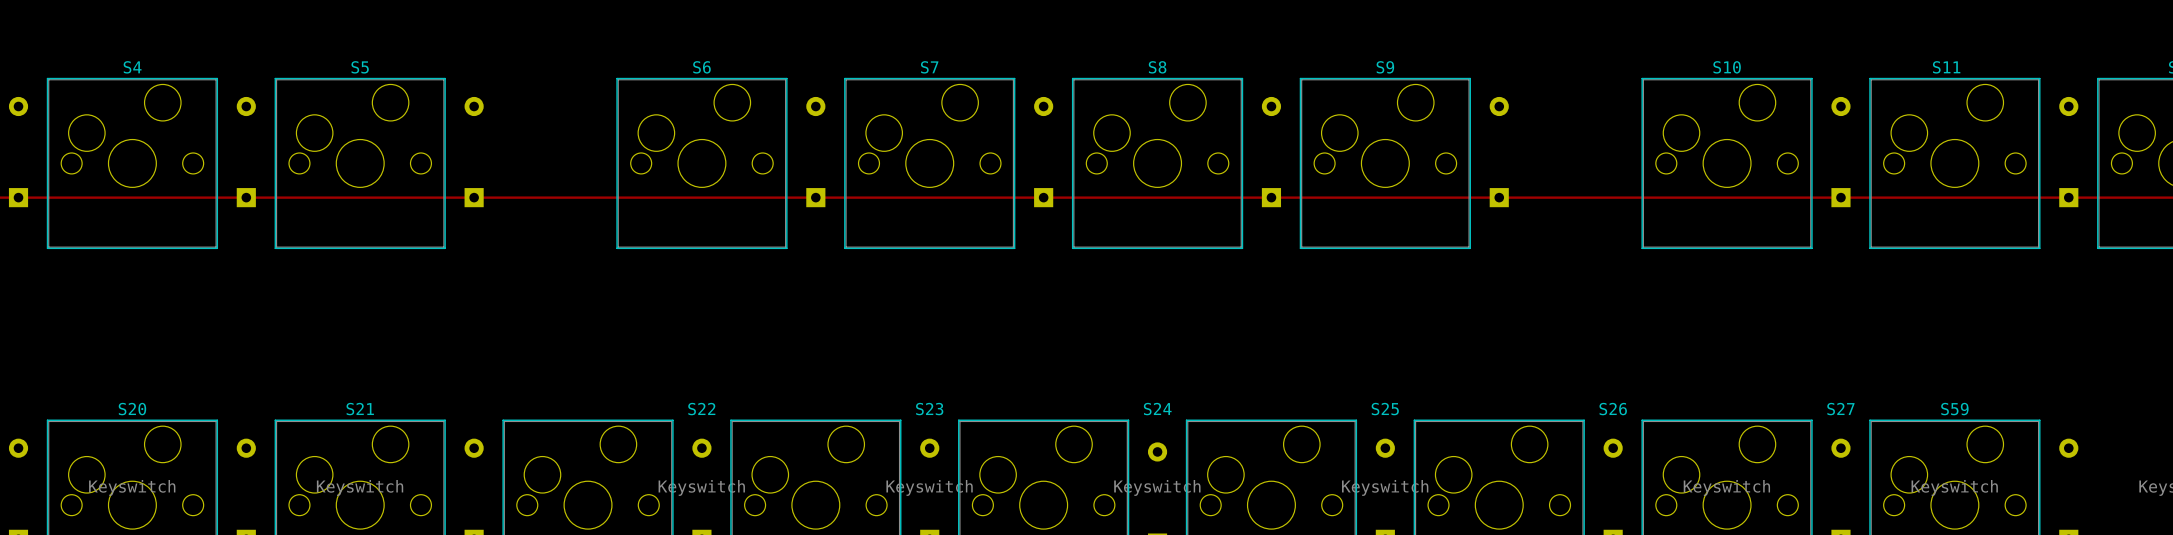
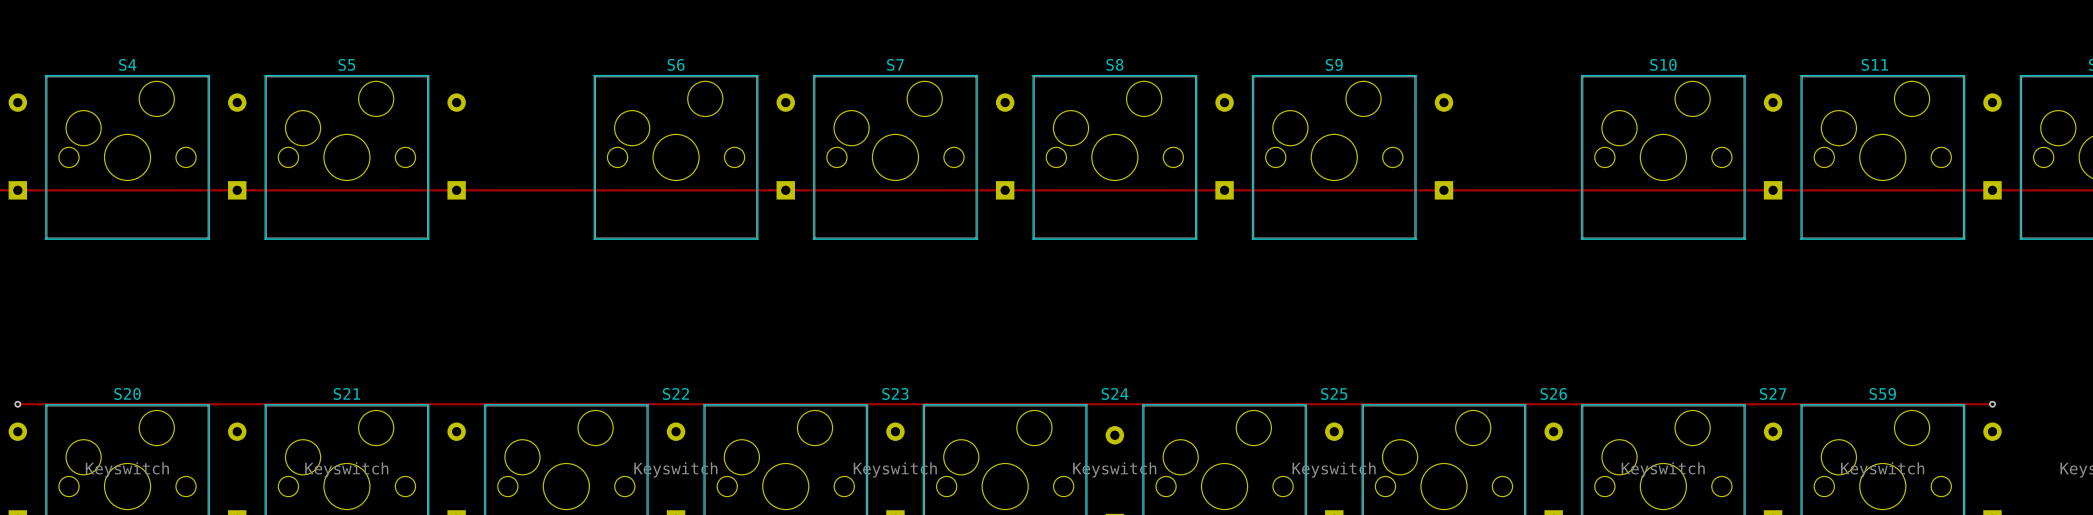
track: none -> (17, 404) (1992, 404)
via: none -> (17, 404)
via: none -> (1992, 404)

